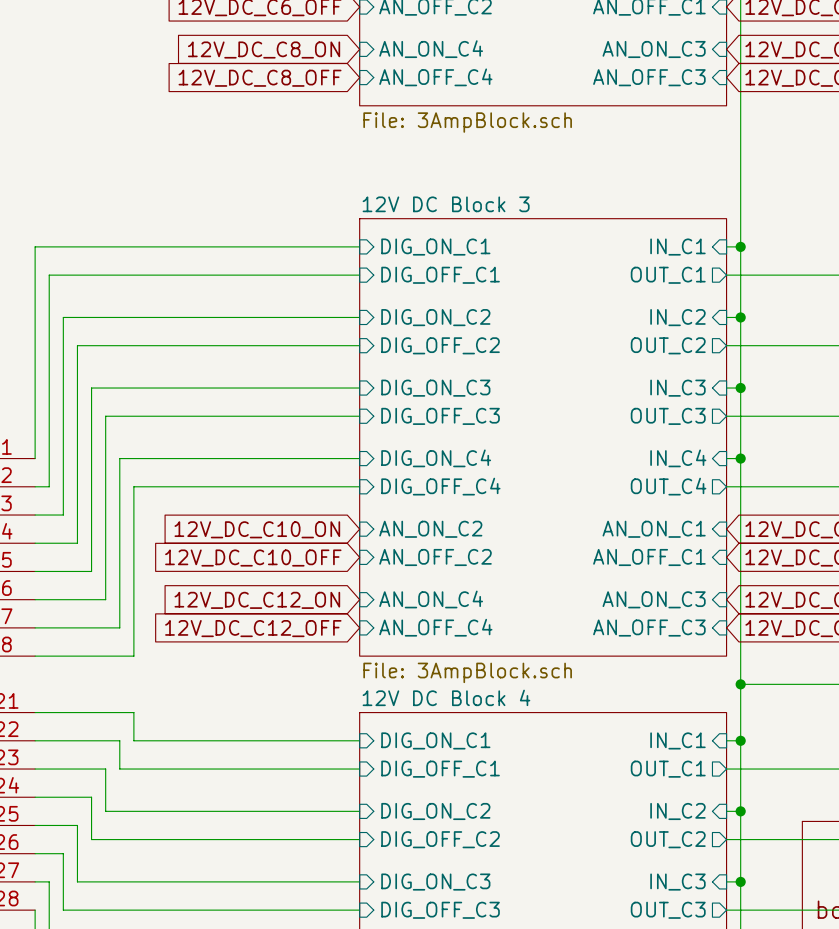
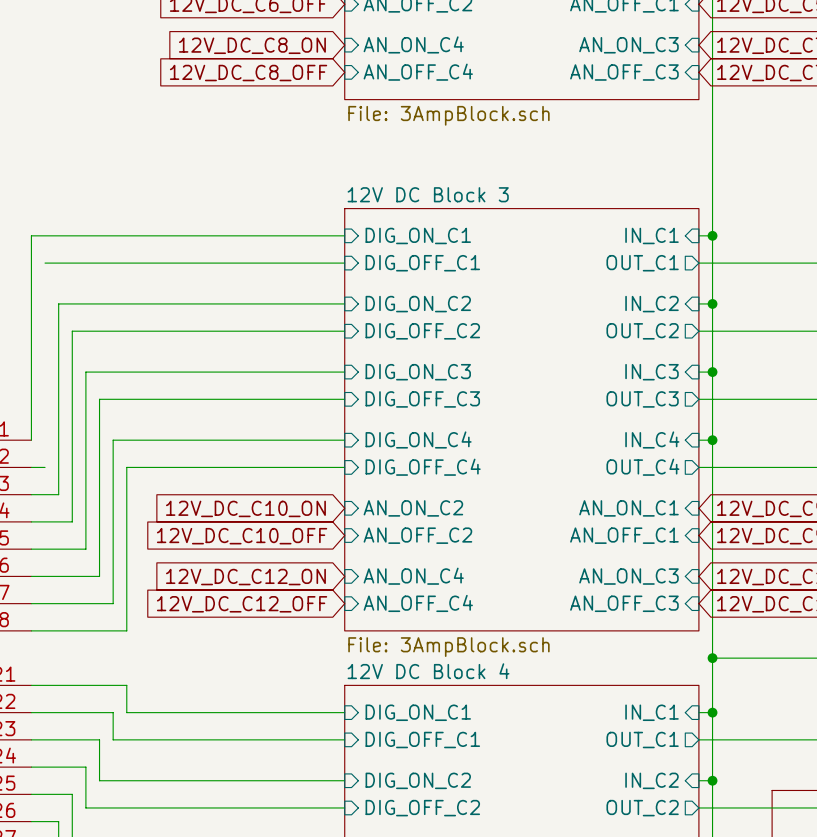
wire: (49, 275) (49, 486) -> none

